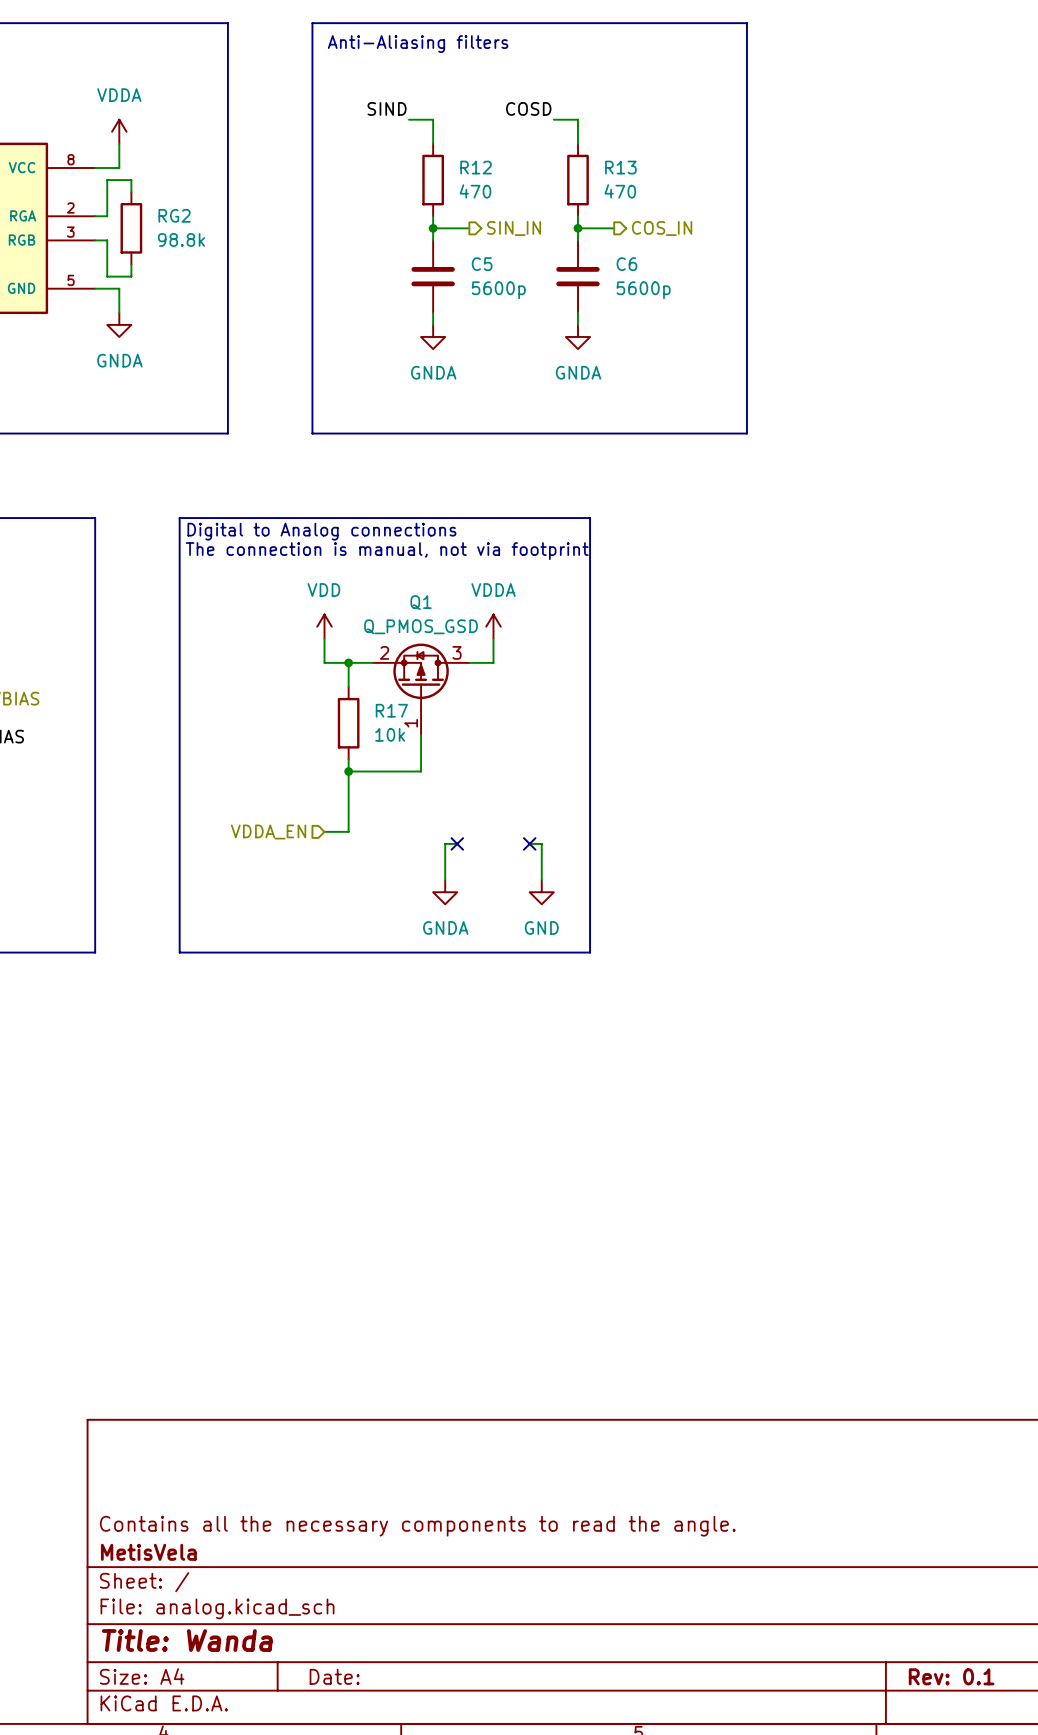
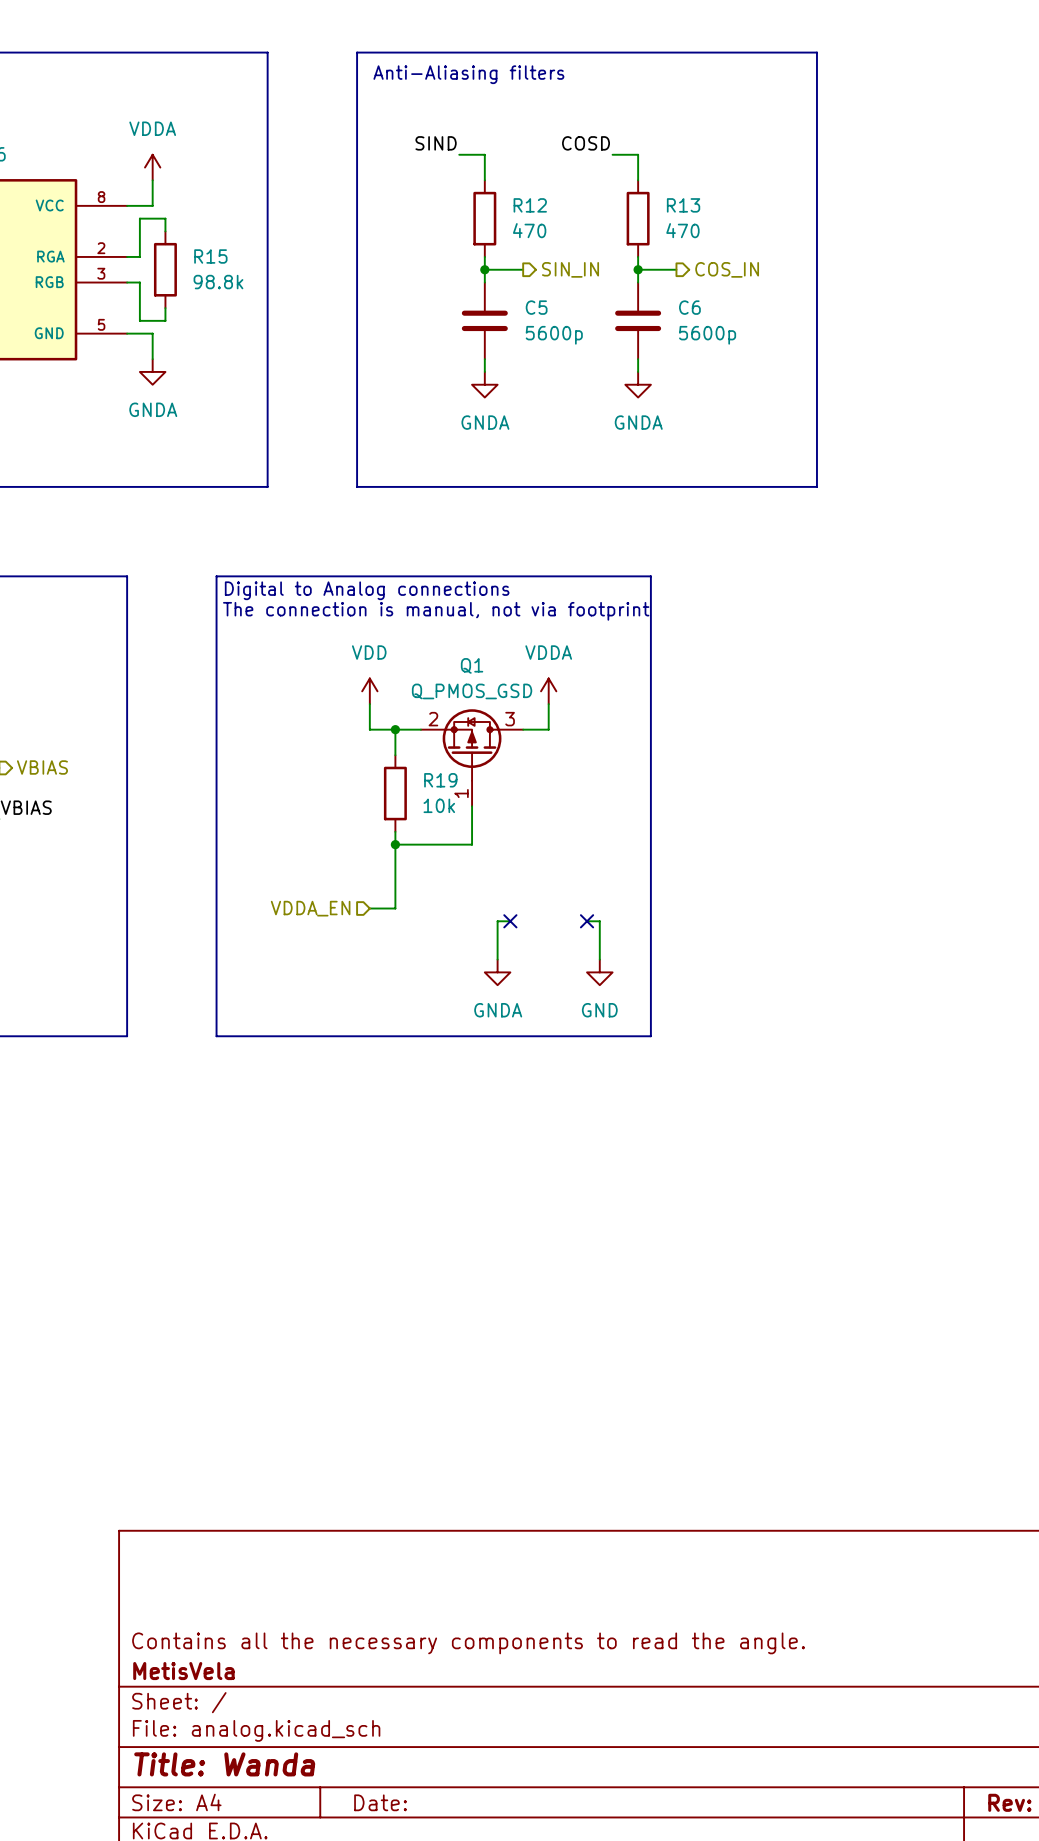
RG2 name: RG2 (174, 215) -> R15 (210, 256)
R17 name: R17 (391, 710) -> R19 (440, 780)

